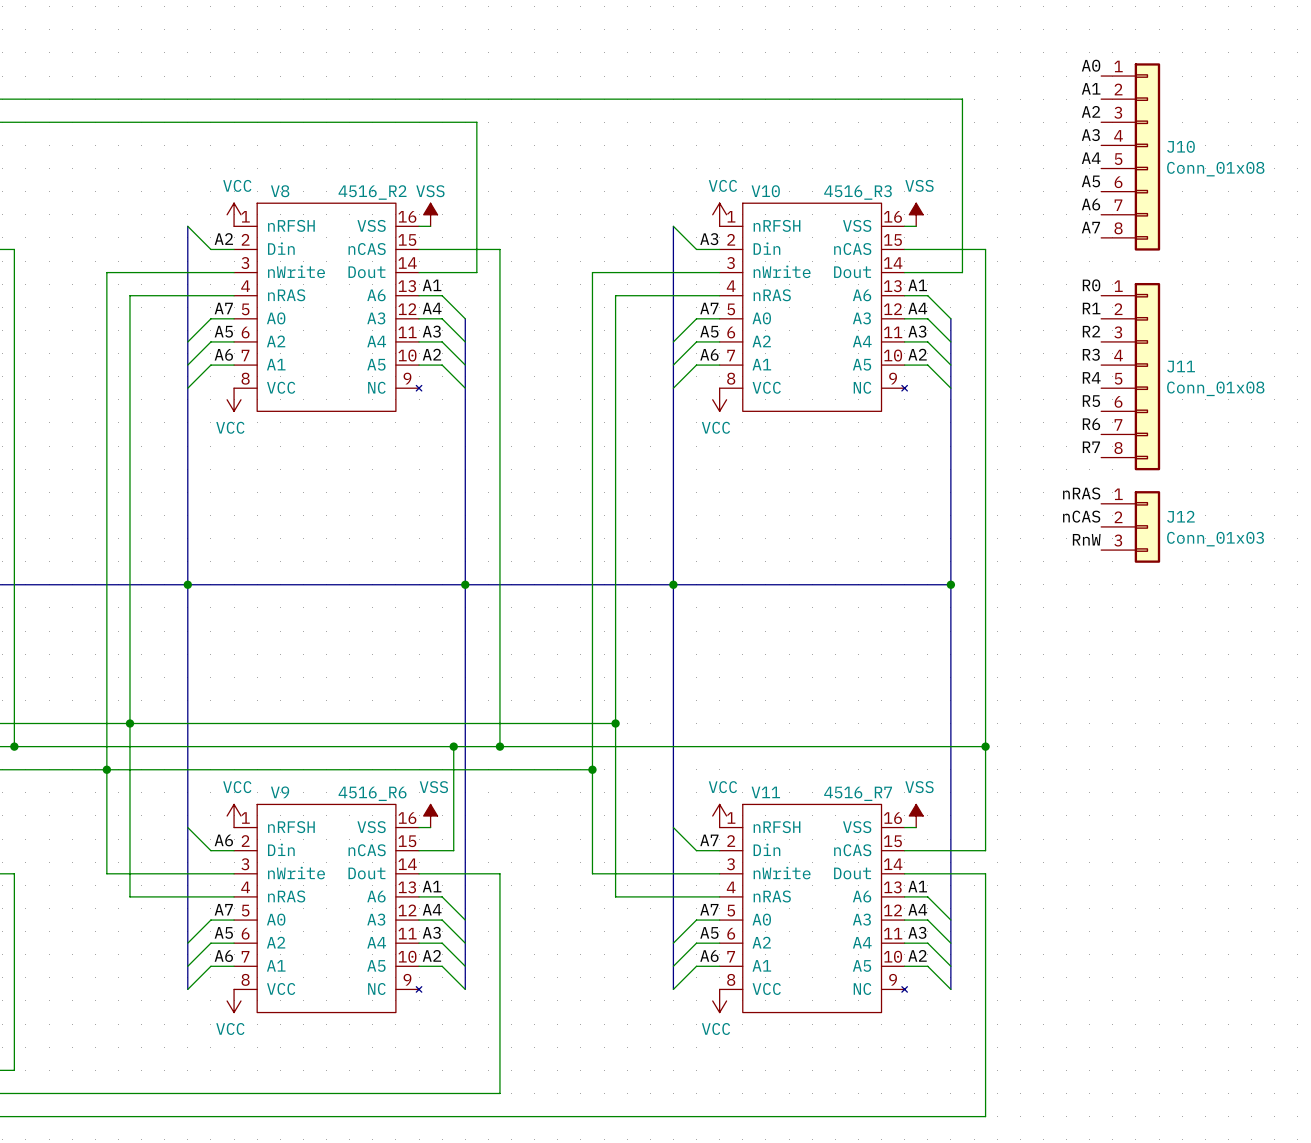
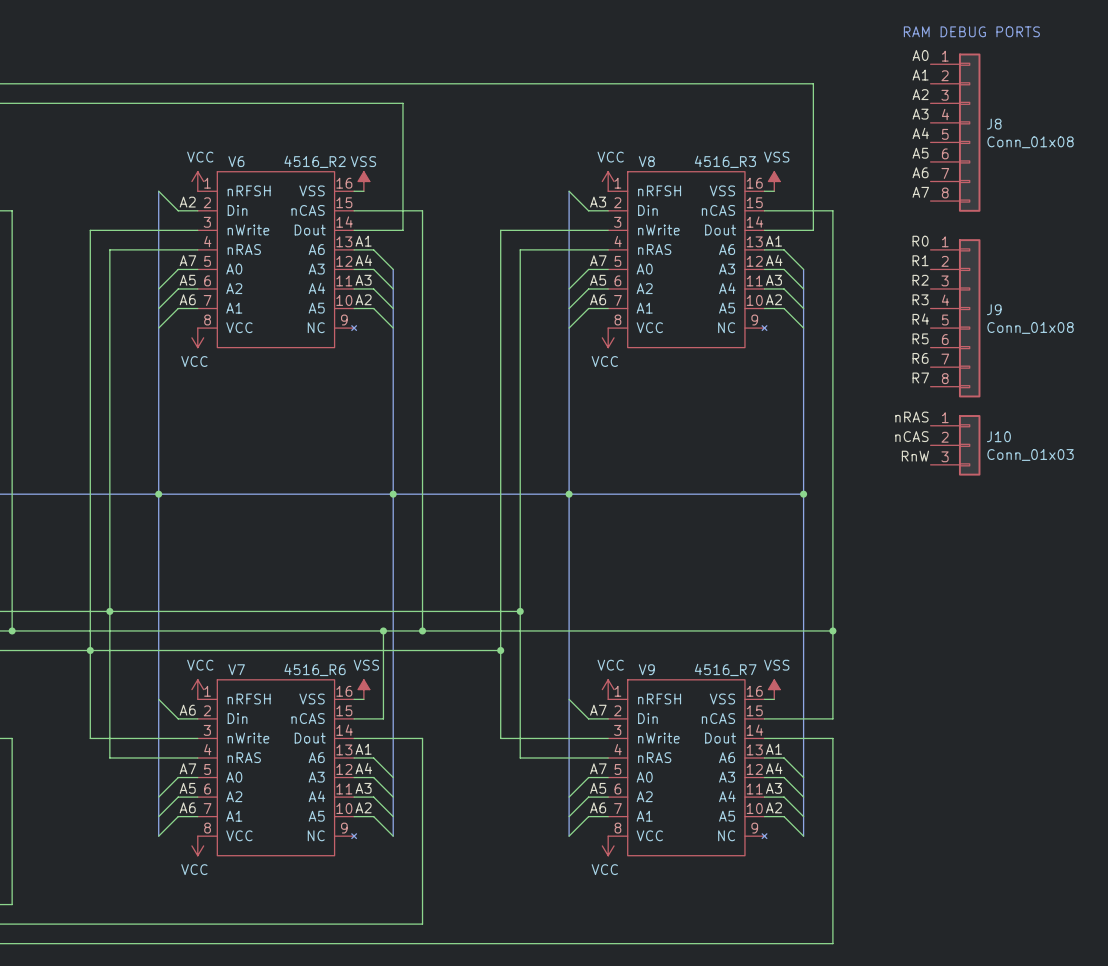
text: none -> RAM DEBUG PORTS (971, 31)
J10 name: J10 (1181, 146) -> J8 (994, 124)
V8 name: V8 (280, 191) -> V6 (236, 161)
V10 name: V10 (765, 191) -> V8 (646, 161)
J11 name: J11 (1181, 366) -> J9 (994, 309)
J12 name: J12 (1180, 516) -> J10 (998, 436)
V9 name: V9 (280, 792) -> V7 (236, 669)
V11 name: V11 (765, 792) -> V9 (646, 669)

